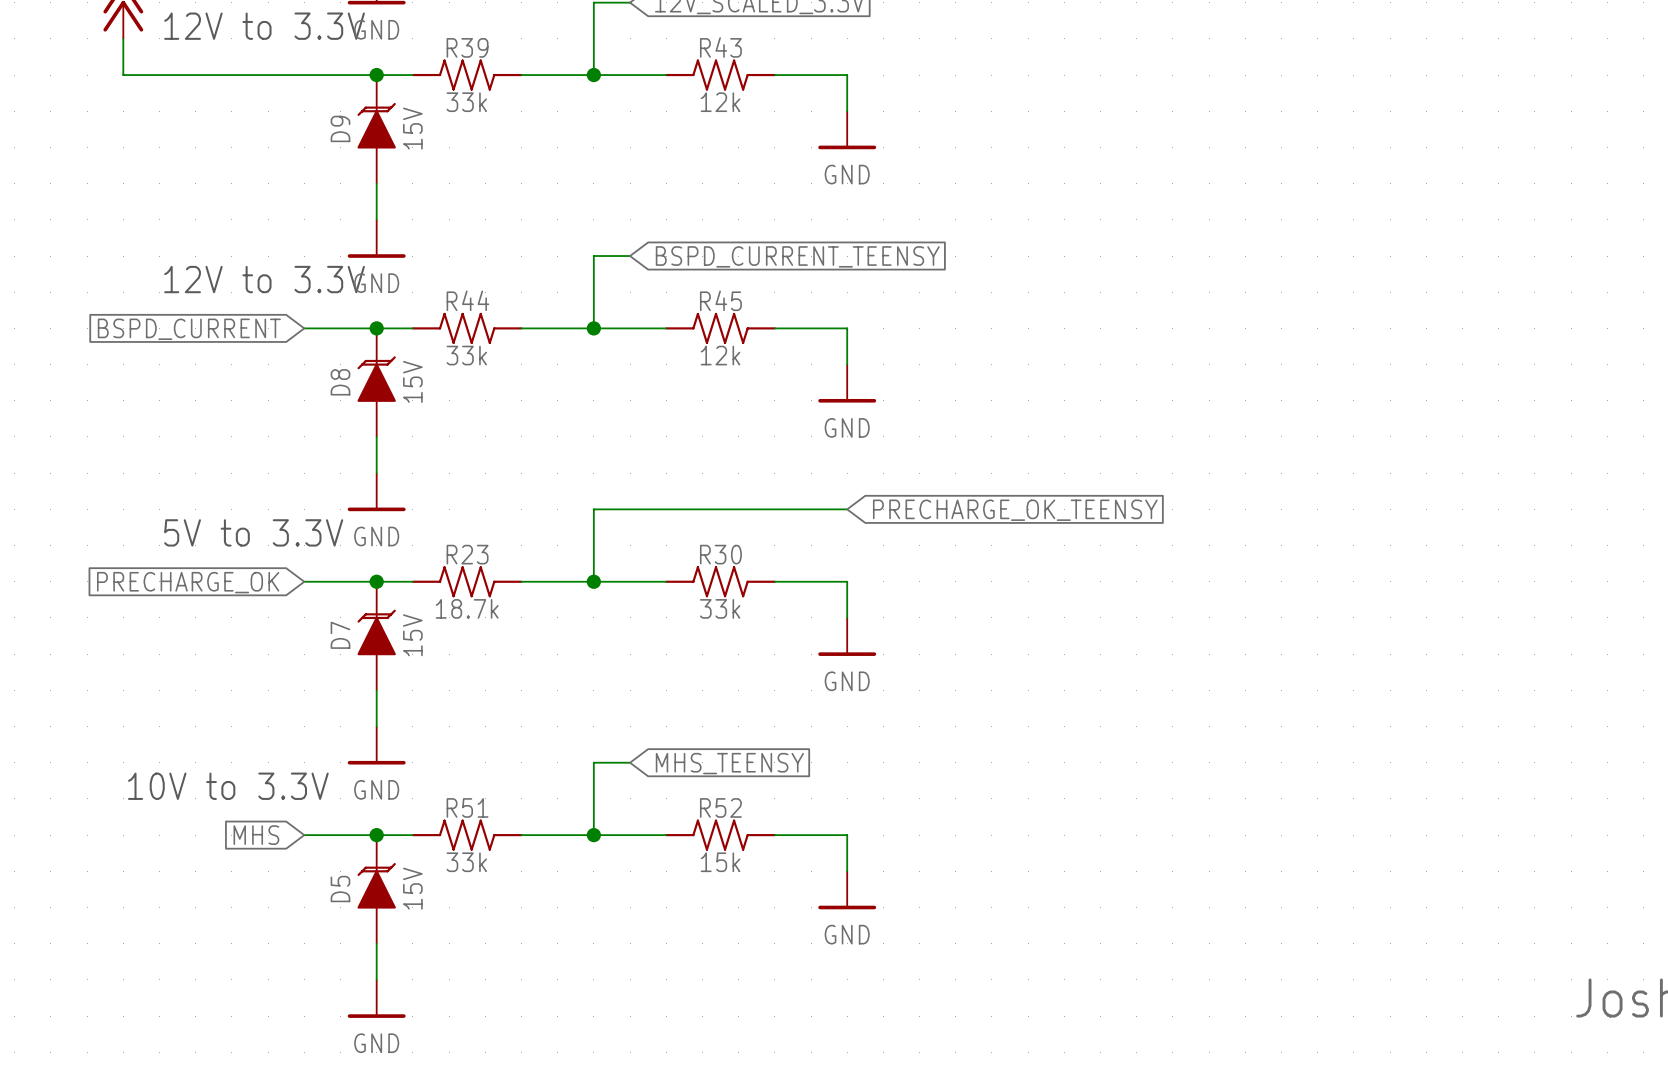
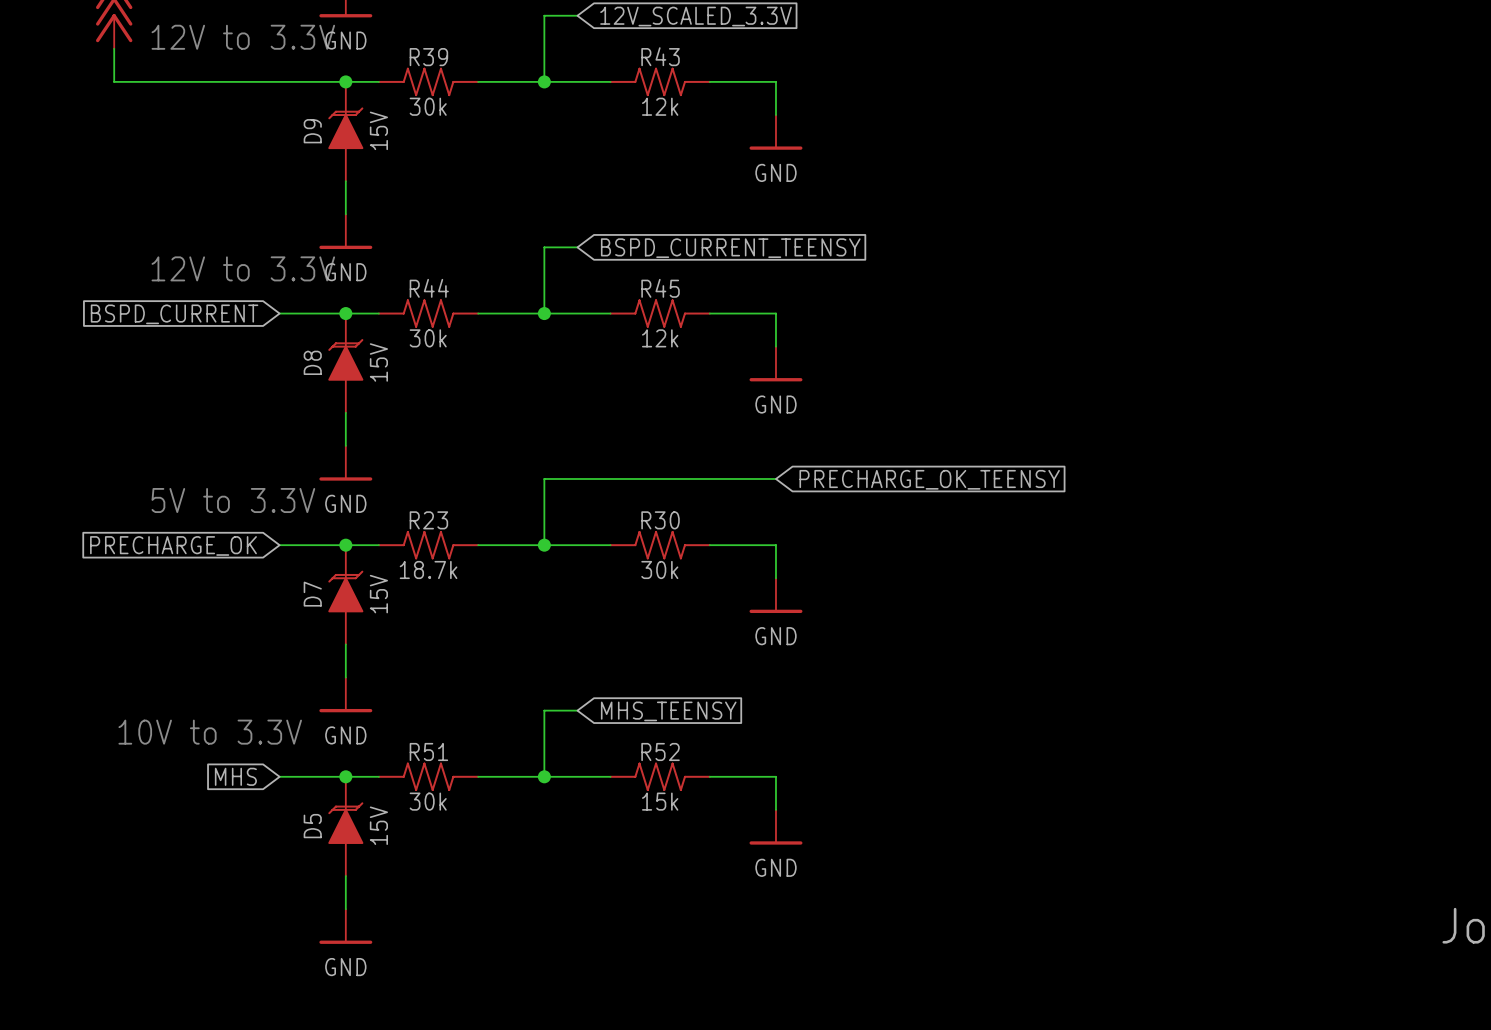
R39 text: 33k (466, 102) -> 30k (428, 106)
R44 text: 33k (466, 355) -> 30k (428, 338)
R30 text: 33k (720, 608) -> 30k (659, 569)
R51 text: 33k (466, 862) -> 30k (428, 801)

